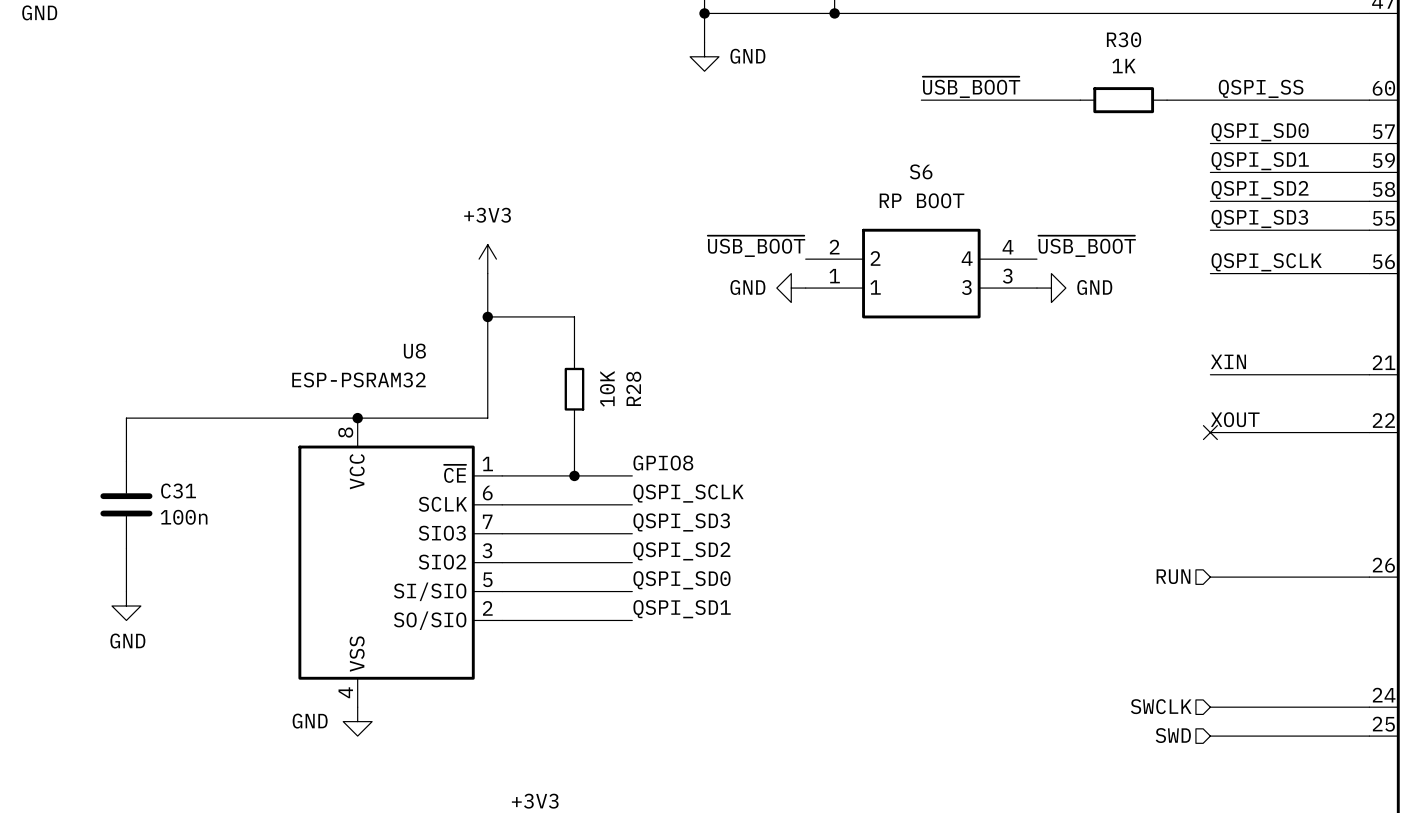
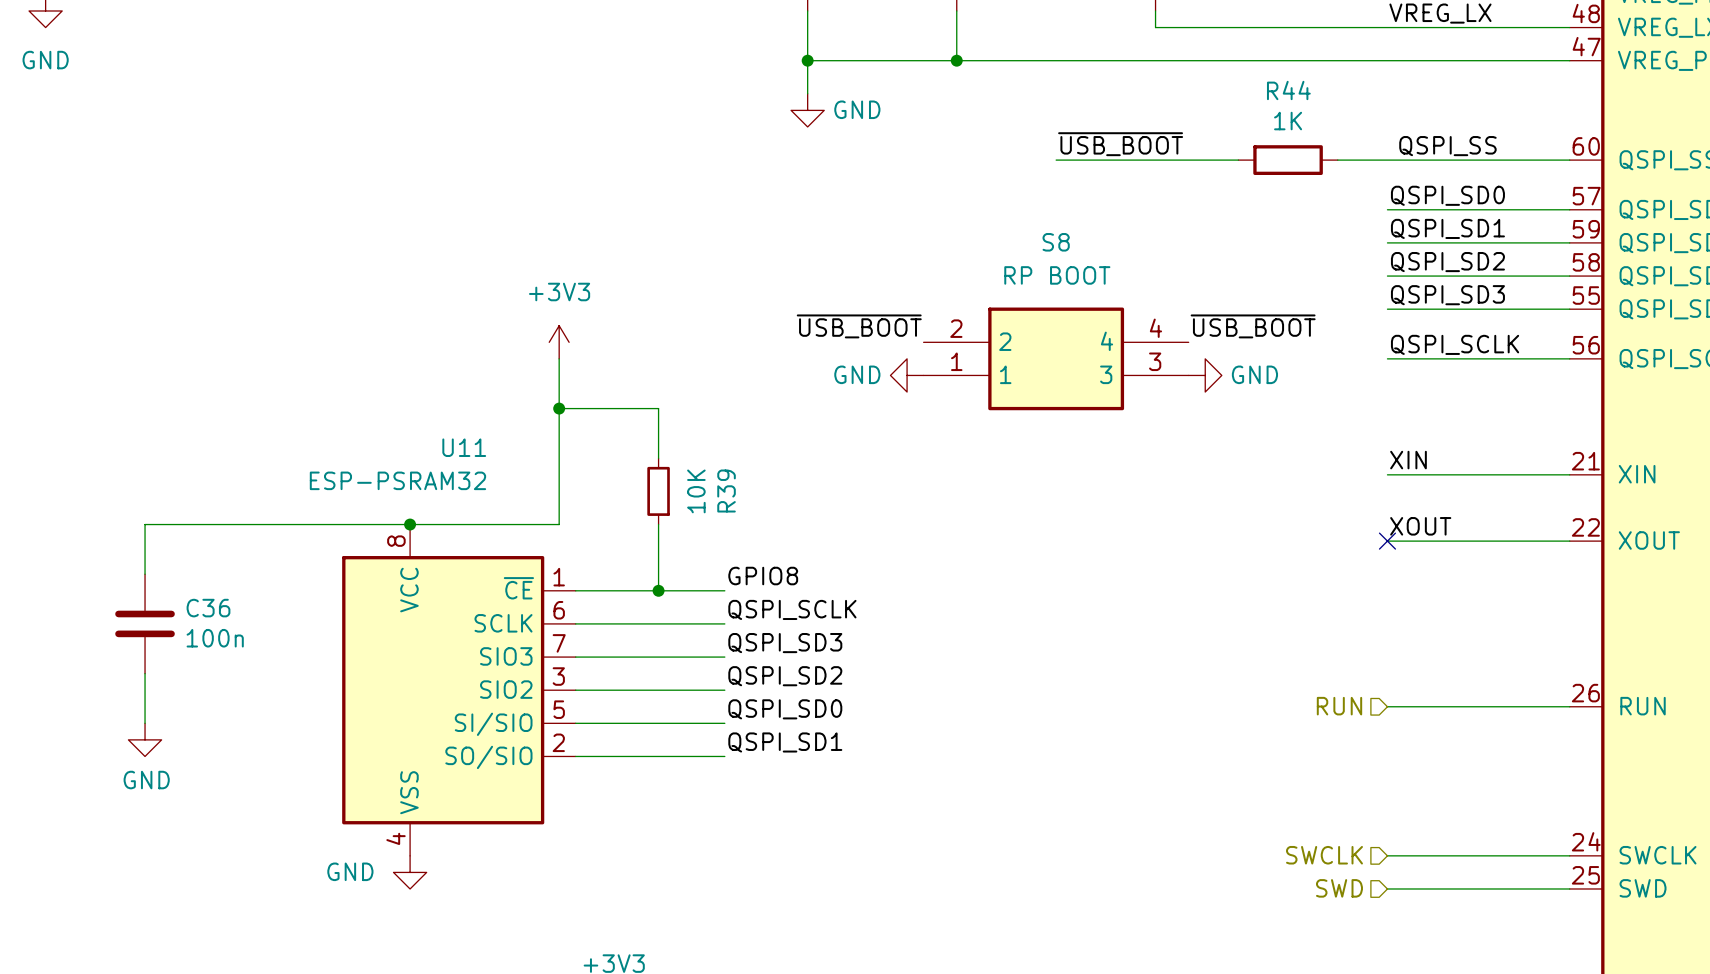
R30 name: R30 (1124, 39) -> R44 (1288, 90)
S6 name: S6 (921, 171) -> S8 (1056, 242)
U8 name: U8 (414, 351) -> U11 (464, 447)
R28 name: R28 (633, 388) -> R39 (726, 491)
C31 name: C31 (178, 491) -> C36 (208, 608)

